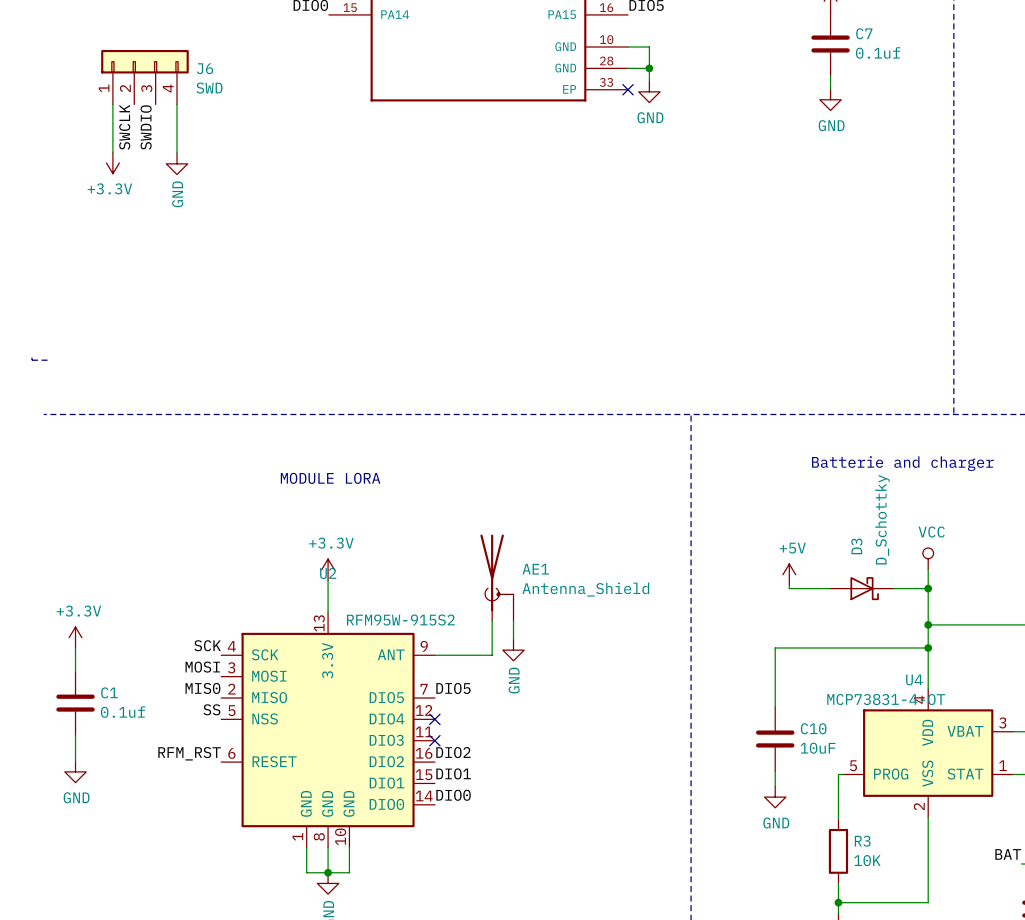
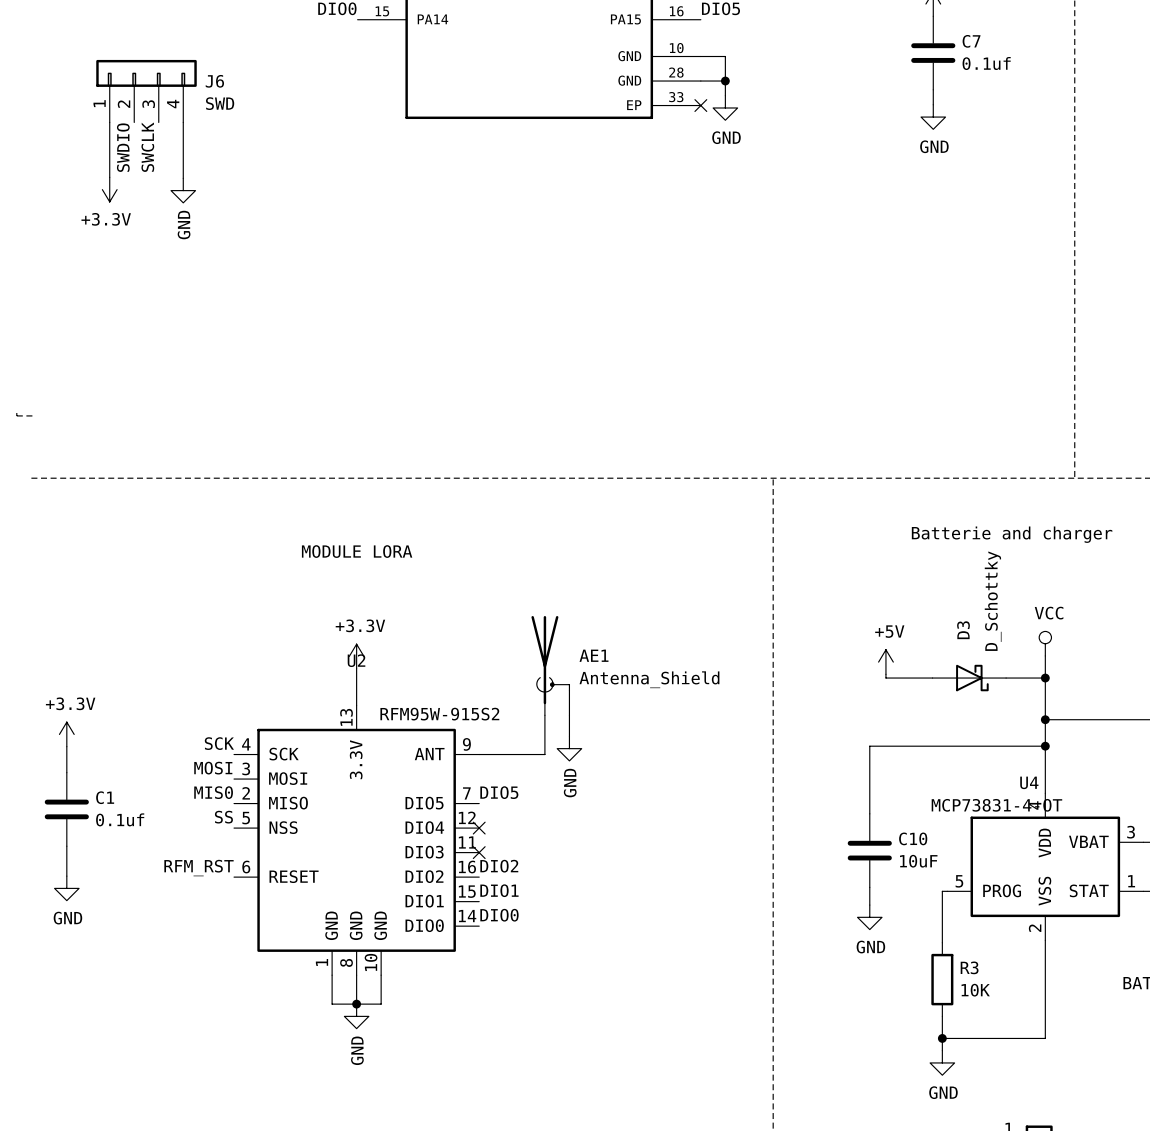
label: SWCLK (124, 127) -> SWDIO (123, 147)
label: SWDIO (146, 127) -> SWCLK (147, 147)

